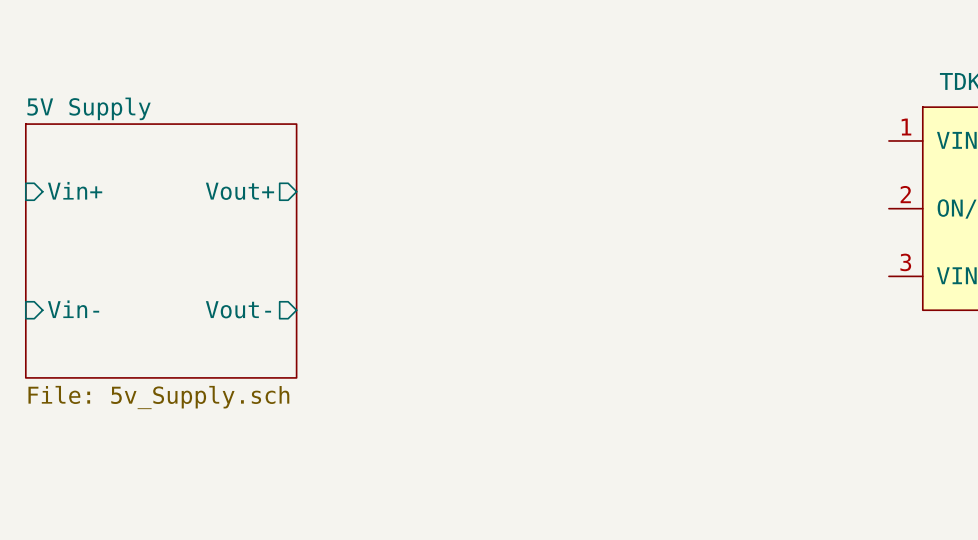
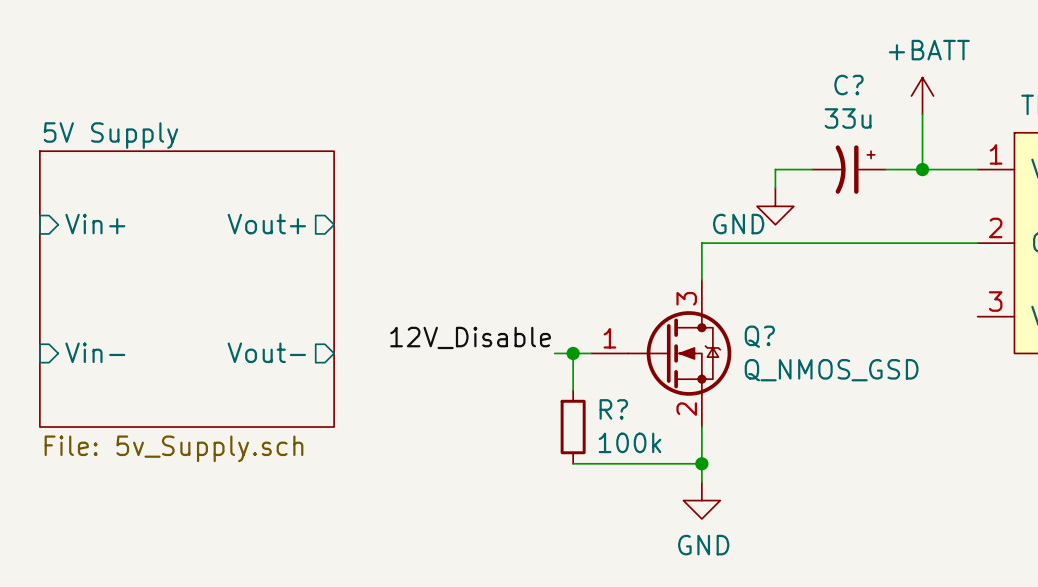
power symbol: none -> +BATT (922, 96)
wire: none -> (922, 114) (922, 169)
wire: none -> (812, 169) (775, 169) (775, 187)
C?: none -> 33u (848, 169)
wire: none -> (885, 169) (977, 169)
junction: none -> (922, 169)
power symbol: none -> GND (775, 206)
wire: none -> (977, 243) (701, 243) (701, 279)
label: none -> 12V_Disable (470, 337)
wire: none -> (554, 353) (591, 353)
wire: none -> (573, 353) (573, 390)
junction: none -> (573, 353)
Q?: none -> Q_NMOS_GSD (661, 353)
R?: none -> 100k (573, 427)
wire: none -> (701, 427) (701, 482)
wire: none -> (573, 463) (701, 463)
junction: none -> (701, 463)
power symbol: none -> GND (701, 500)

